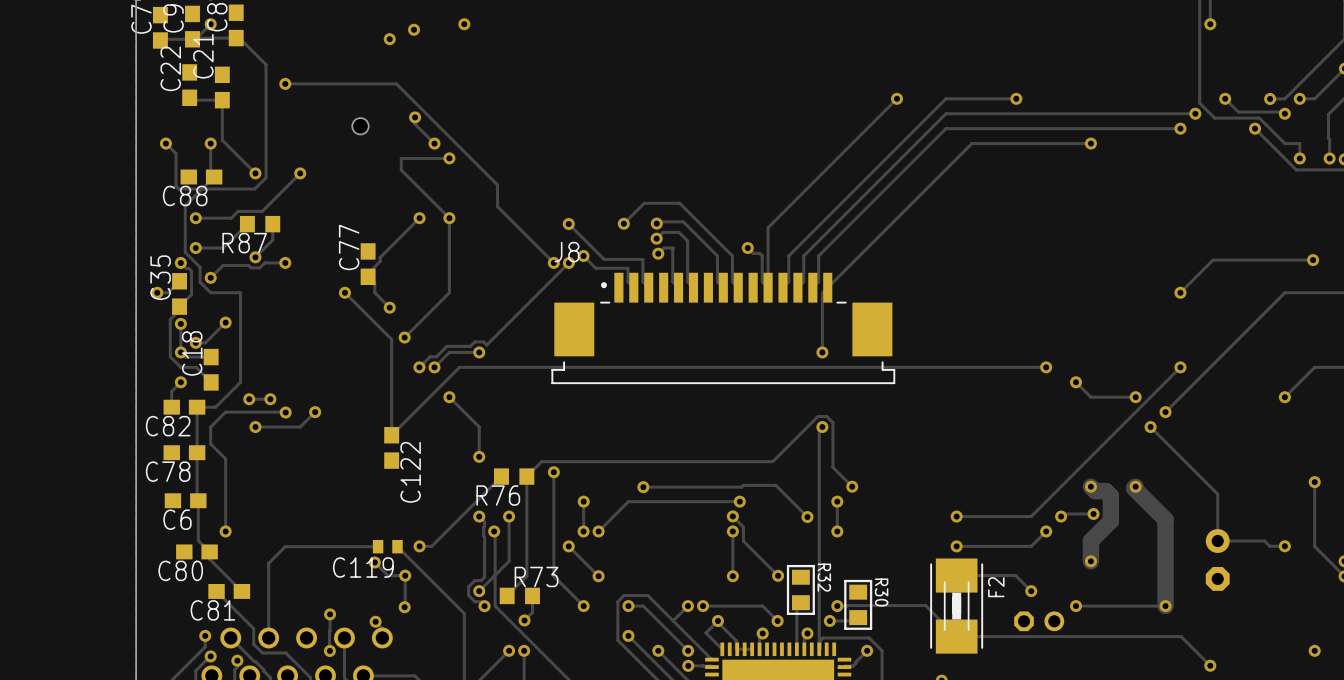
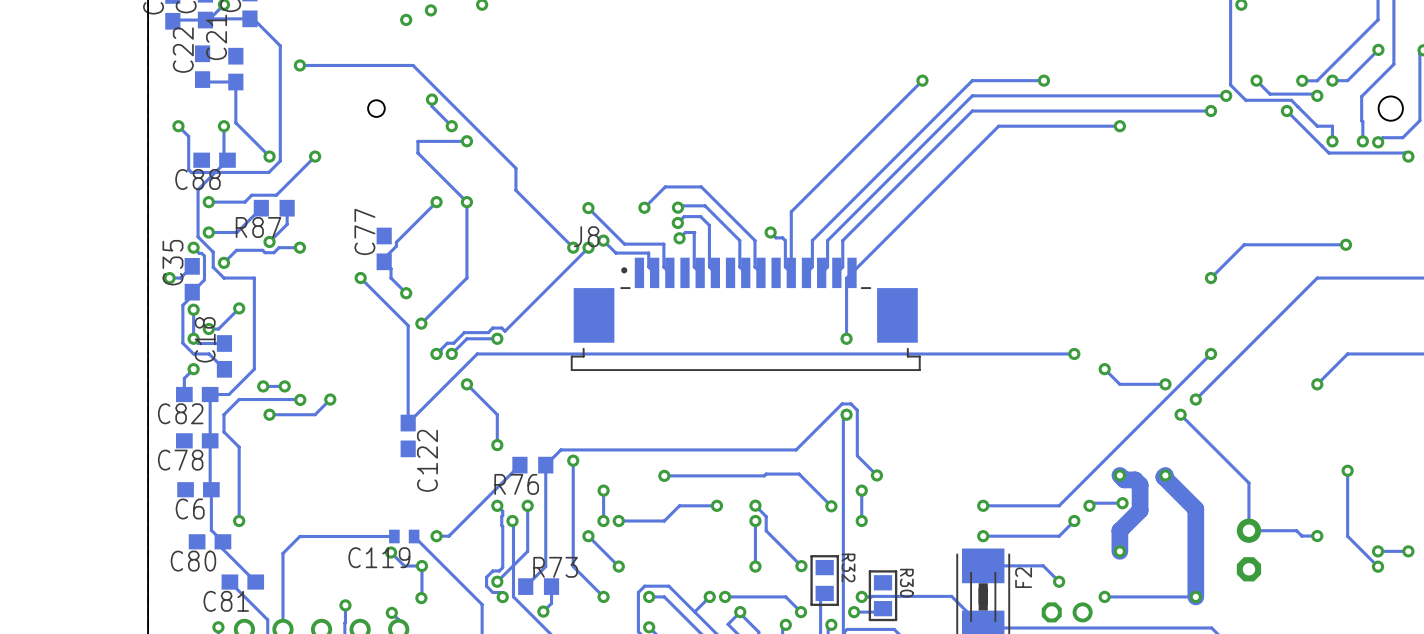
track: (739, 501) (628, 501) (598, 531) -> (716, 505) (679, 505) (664, 521) (618, 521)
via position: (739, 501) -> (716, 505)

